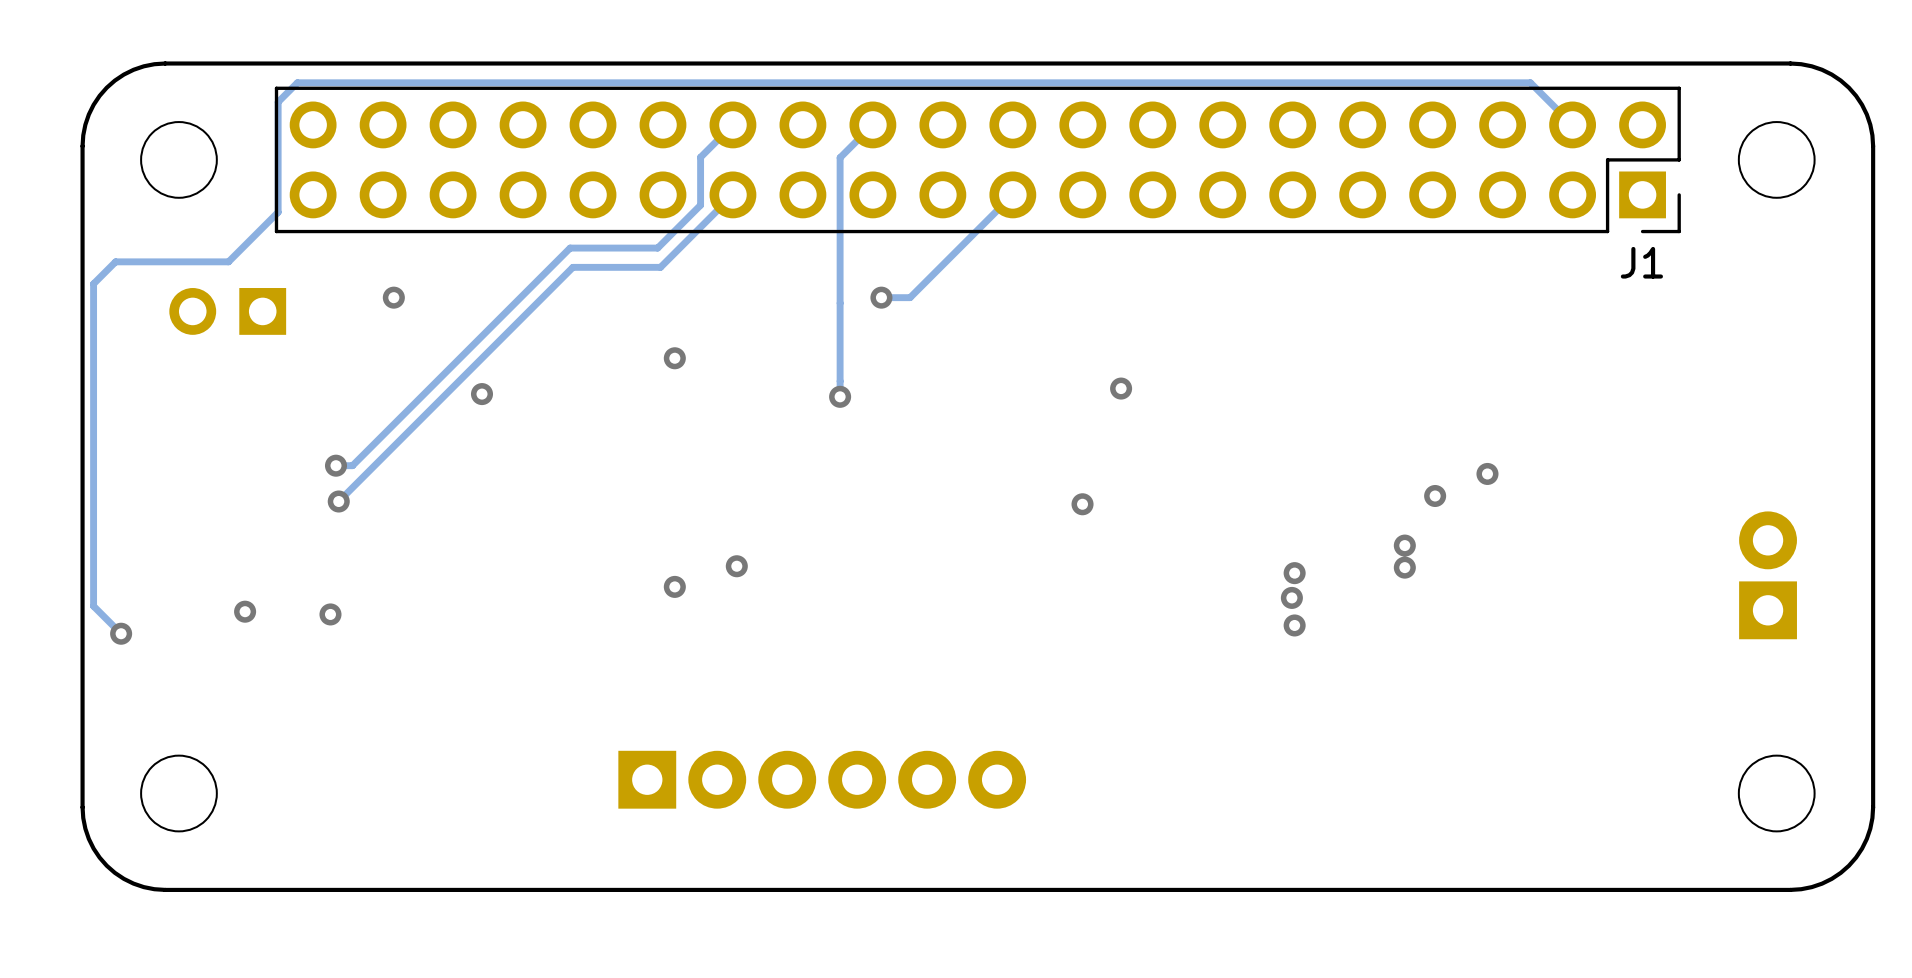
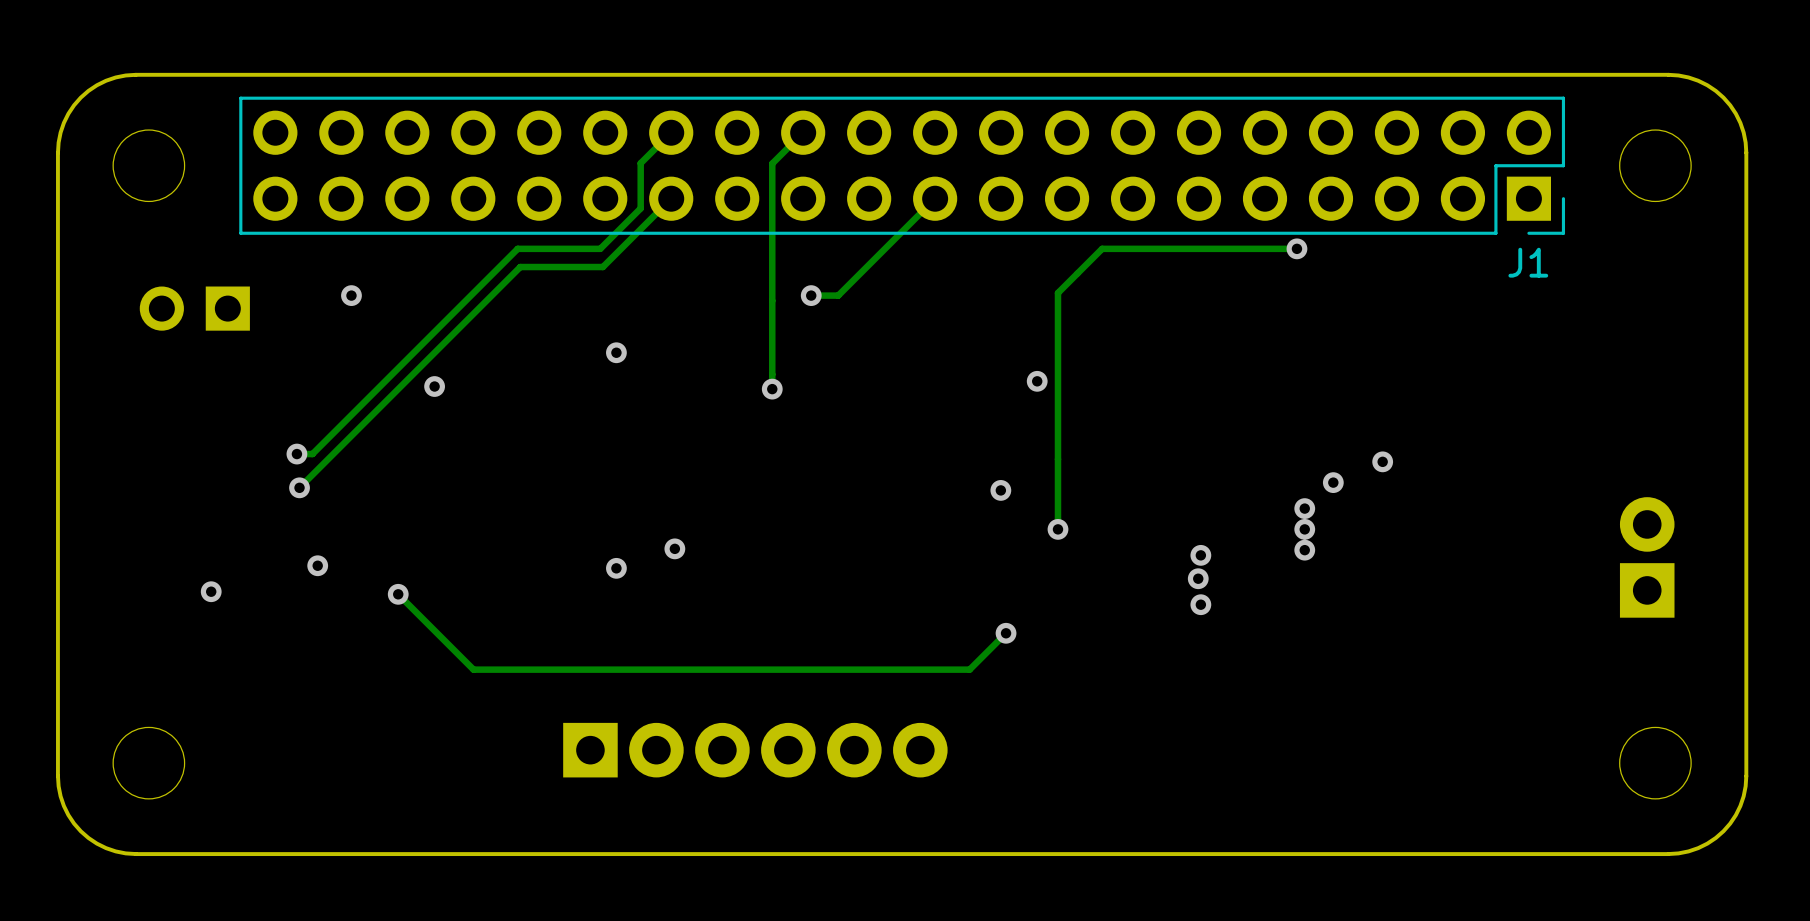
track: (1572, 124) (1530, 82) (297, 82) (278, 102) (278, 212) (228, 261) (115, 261) (93, 283) (93, 606) (121, 633) -> none
track: none -> (1296, 248) (1102, 248) (1057, 293) (1057, 529)
via: none -> (1296, 248)
via: none -> (1304, 508)
via: none -> (1057, 529)
via position: (330, 614) -> (317, 565)
track: none -> (398, 594) (473, 669) (969, 669) (1006, 633)
via: none -> (398, 594)
via: (121, 633) -> none
via: none -> (1006, 633)

